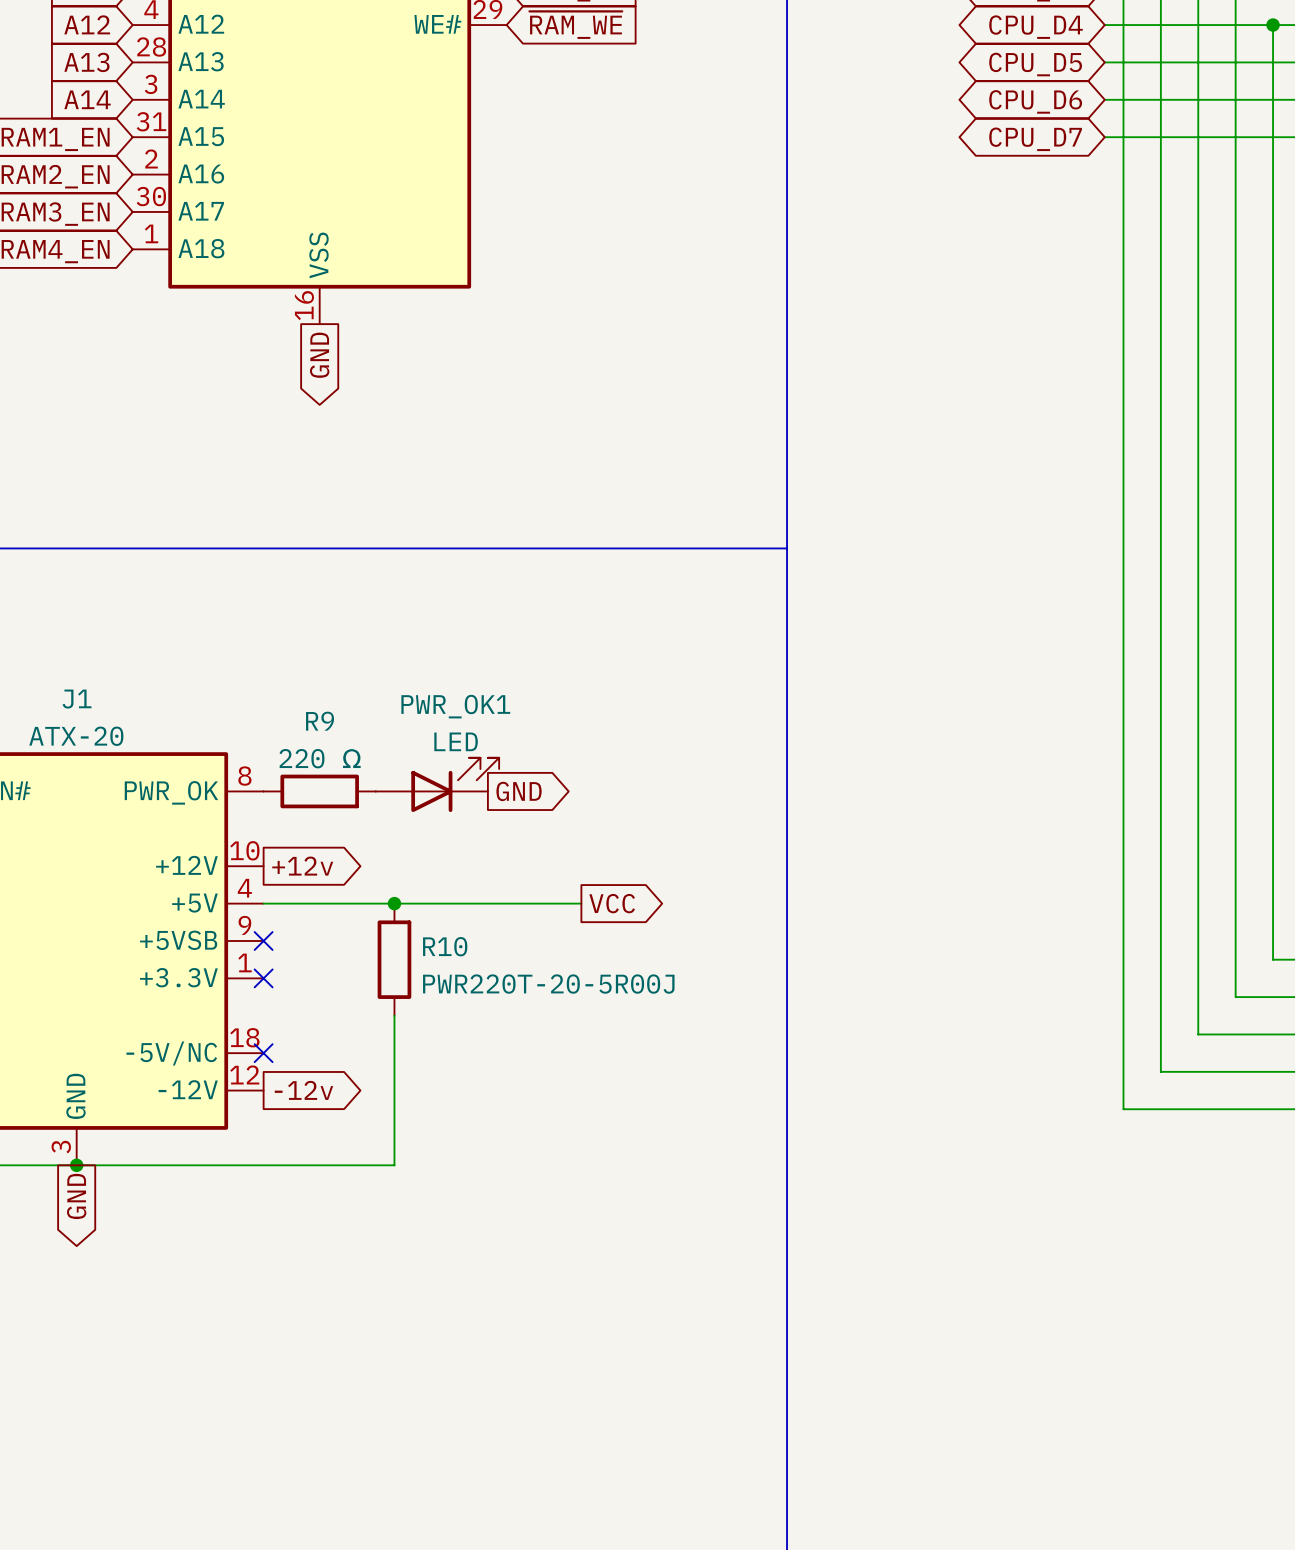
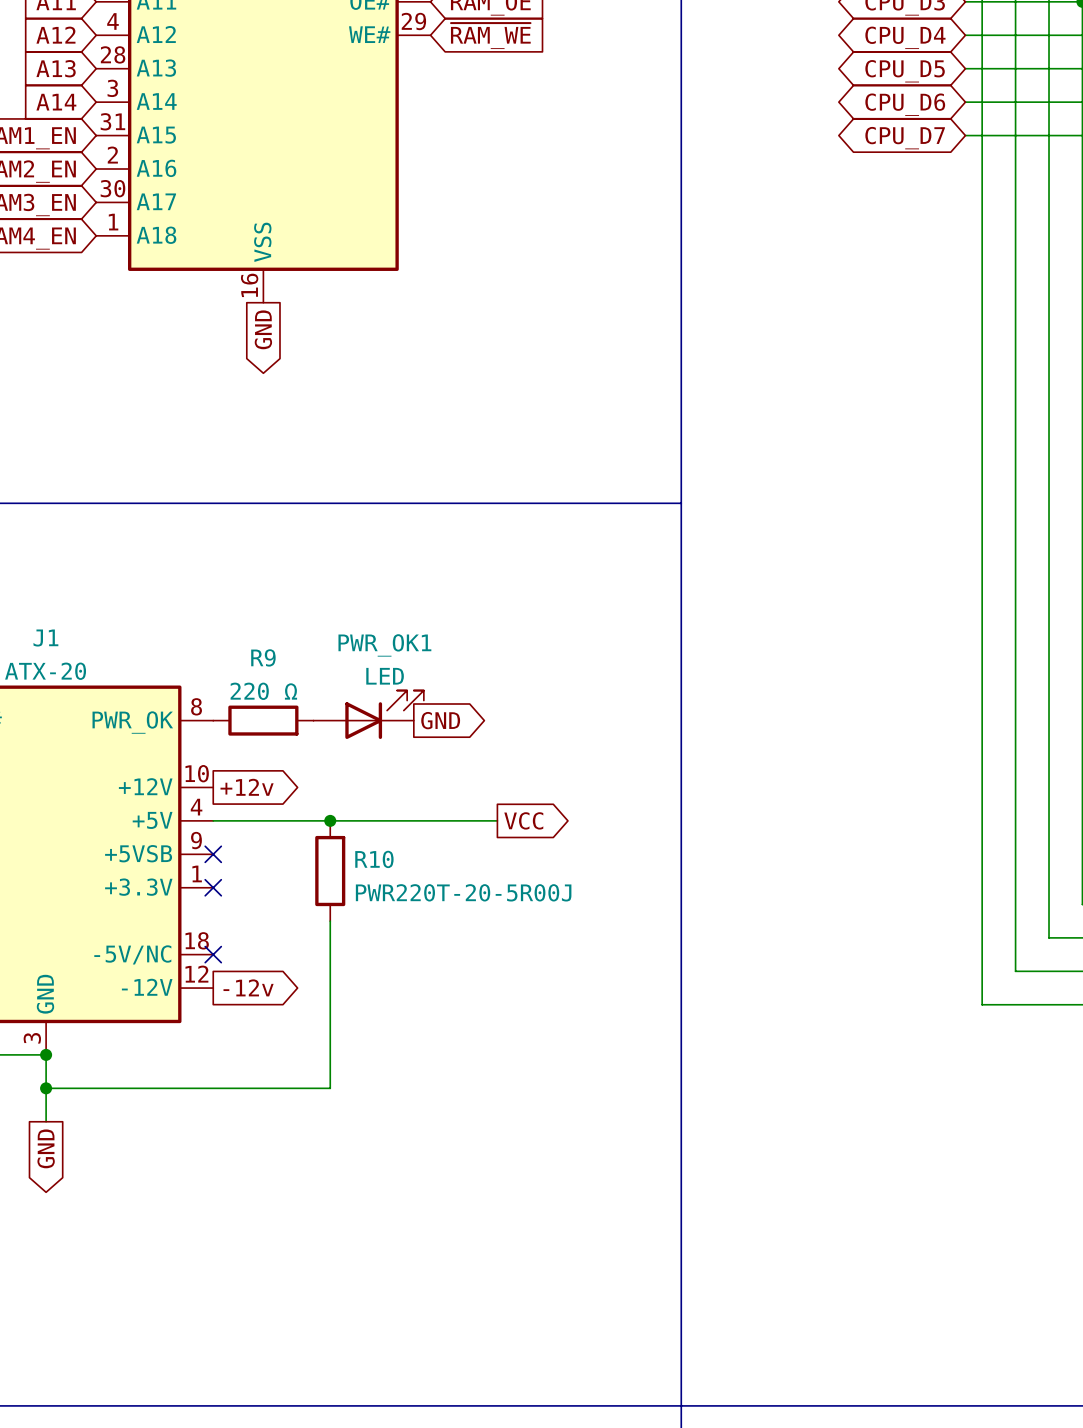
wire: (76, 1165) (394, 1165) -> (46, 1088) (330, 1088) (330, 1054)
wire: none -> (46, 1054) (46, 1121)
global label position: GND (76, 1196) -> GND (46, 1148)
junction: none -> (46, 1088)

